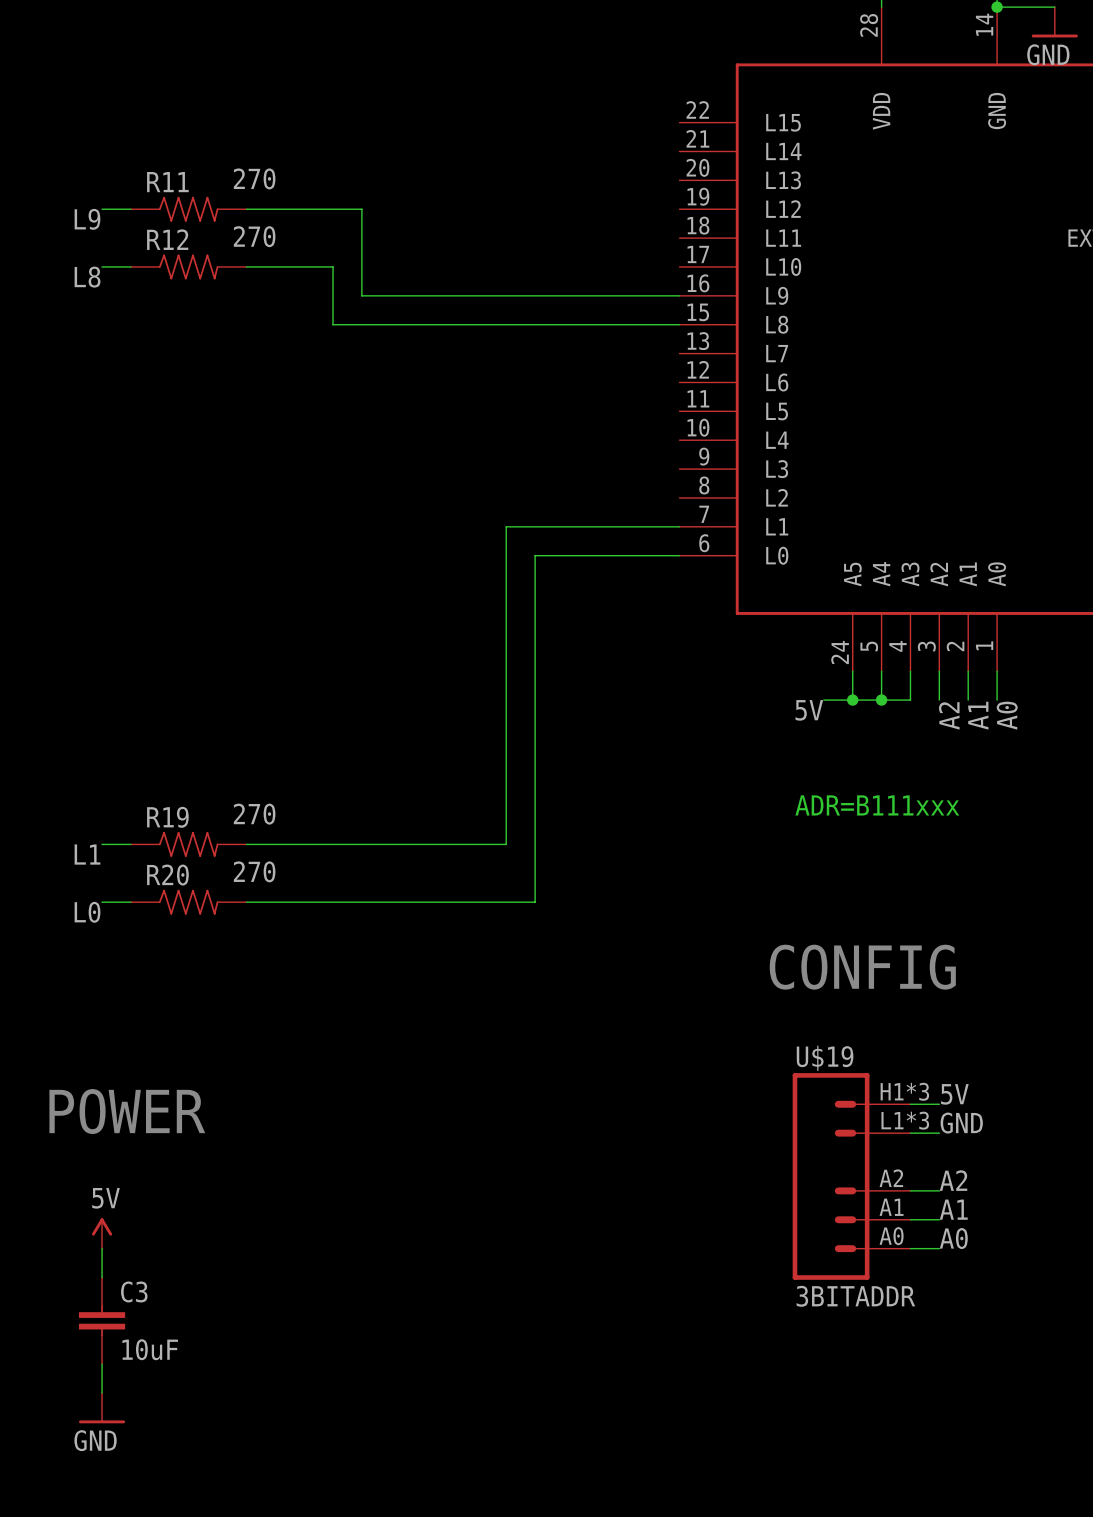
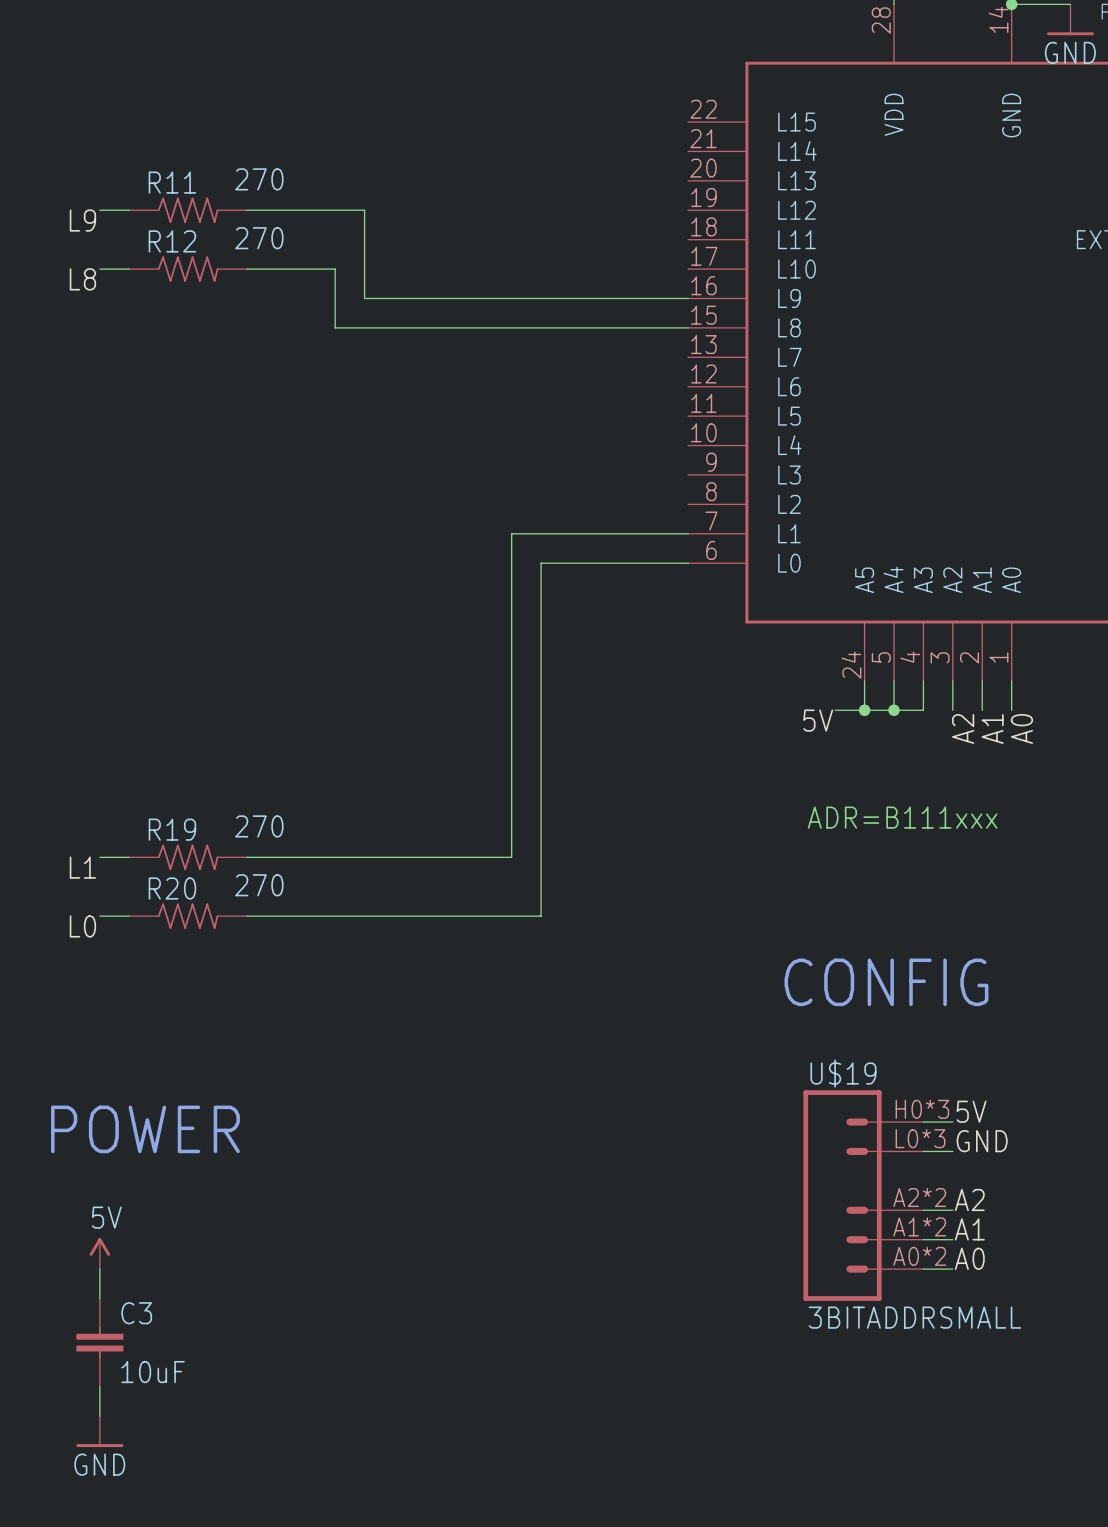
U$19 pin number: H1*3 (904, 1091) -> H0*3 (922, 1109)
U$19 pin number: L1*3 (905, 1120) -> L0*3 (920, 1138)
U$19 pin number: A2 (891, 1178) -> A2*2 (919, 1197)
U$19 pin number: A1 (891, 1207) -> A1*2 (919, 1226)
U$19 pin number: A0 (891, 1236) -> A0*2 (919, 1256)
U$19 value: 3BITADDR (855, 1296) -> 3BITADDRSMALL (914, 1317)

